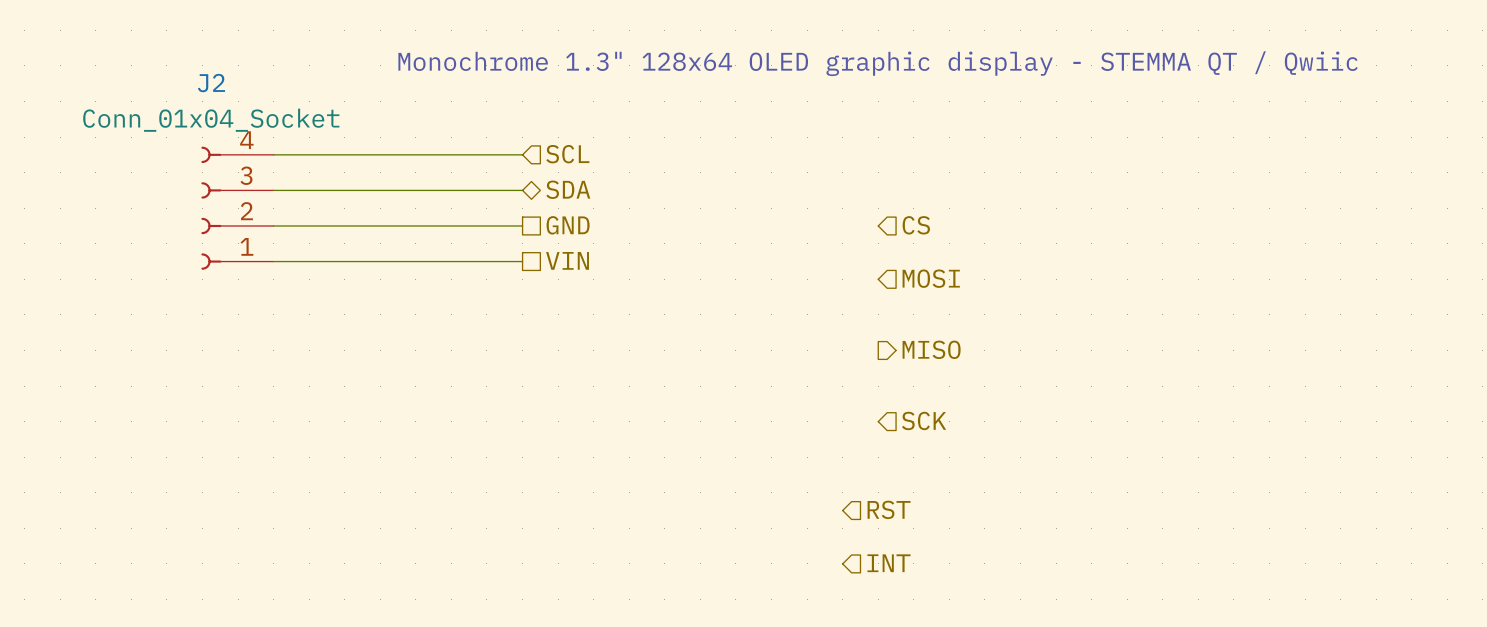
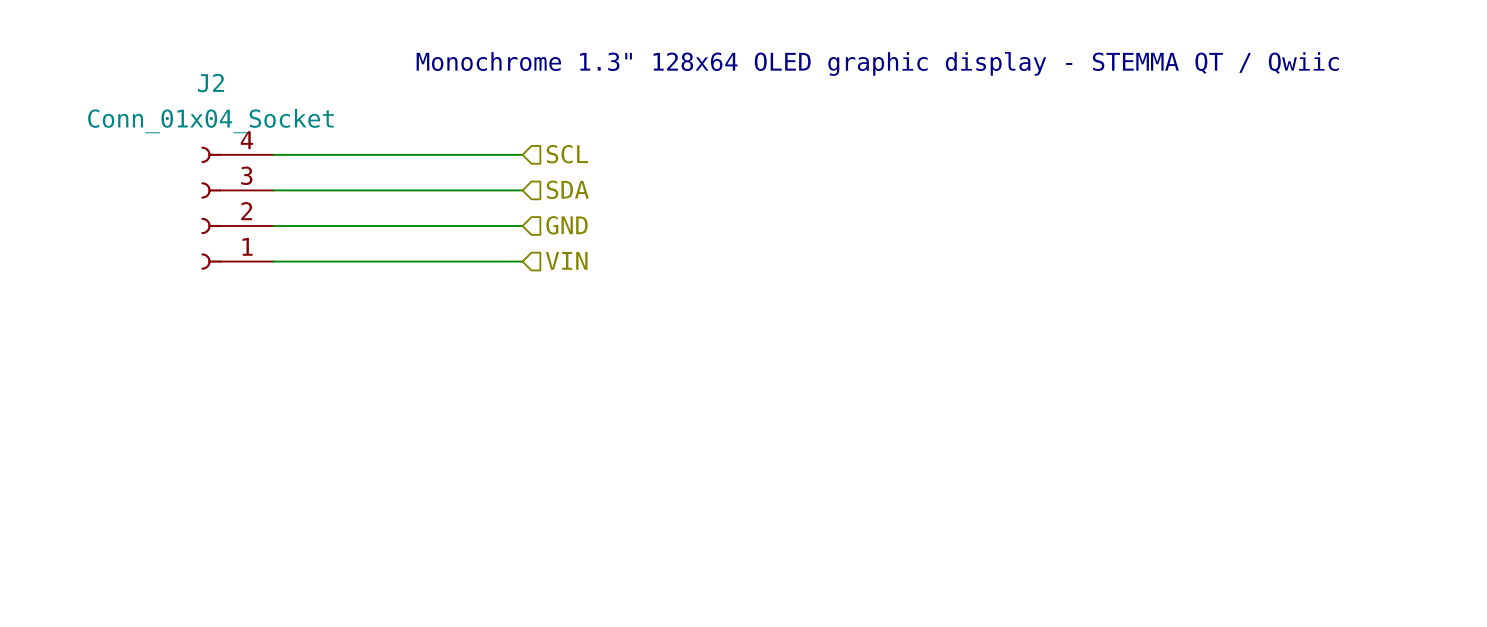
hierarchical label shape: bidirectional (568, 189) -> input (567, 189)
hierarchical label shape: passive (568, 225) -> input (567, 225)
hierarchical label: CS (916, 225) -> none
hierarchical label shape: passive (567, 260) -> input (566, 260)
hierarchical label: MOSI (931, 278) -> none
hierarchical label: MISO (931, 349) -> none
hierarchical label: SCK (924, 420) -> none
hierarchical label: RST (889, 509) -> none
hierarchical label: INT (888, 563) -> none

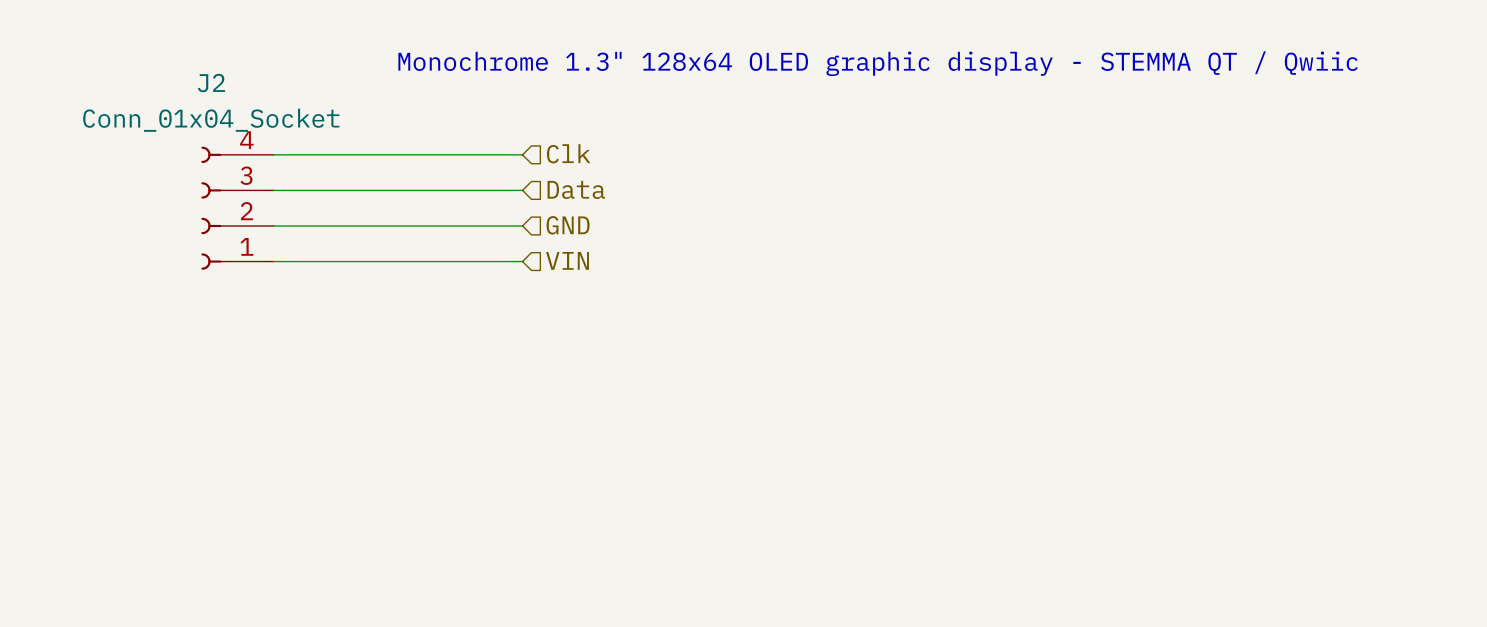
hierarchical label: SCL (567, 154) -> Clk (568, 153)
hierarchical label: SDA (567, 189) -> Data (576, 189)

